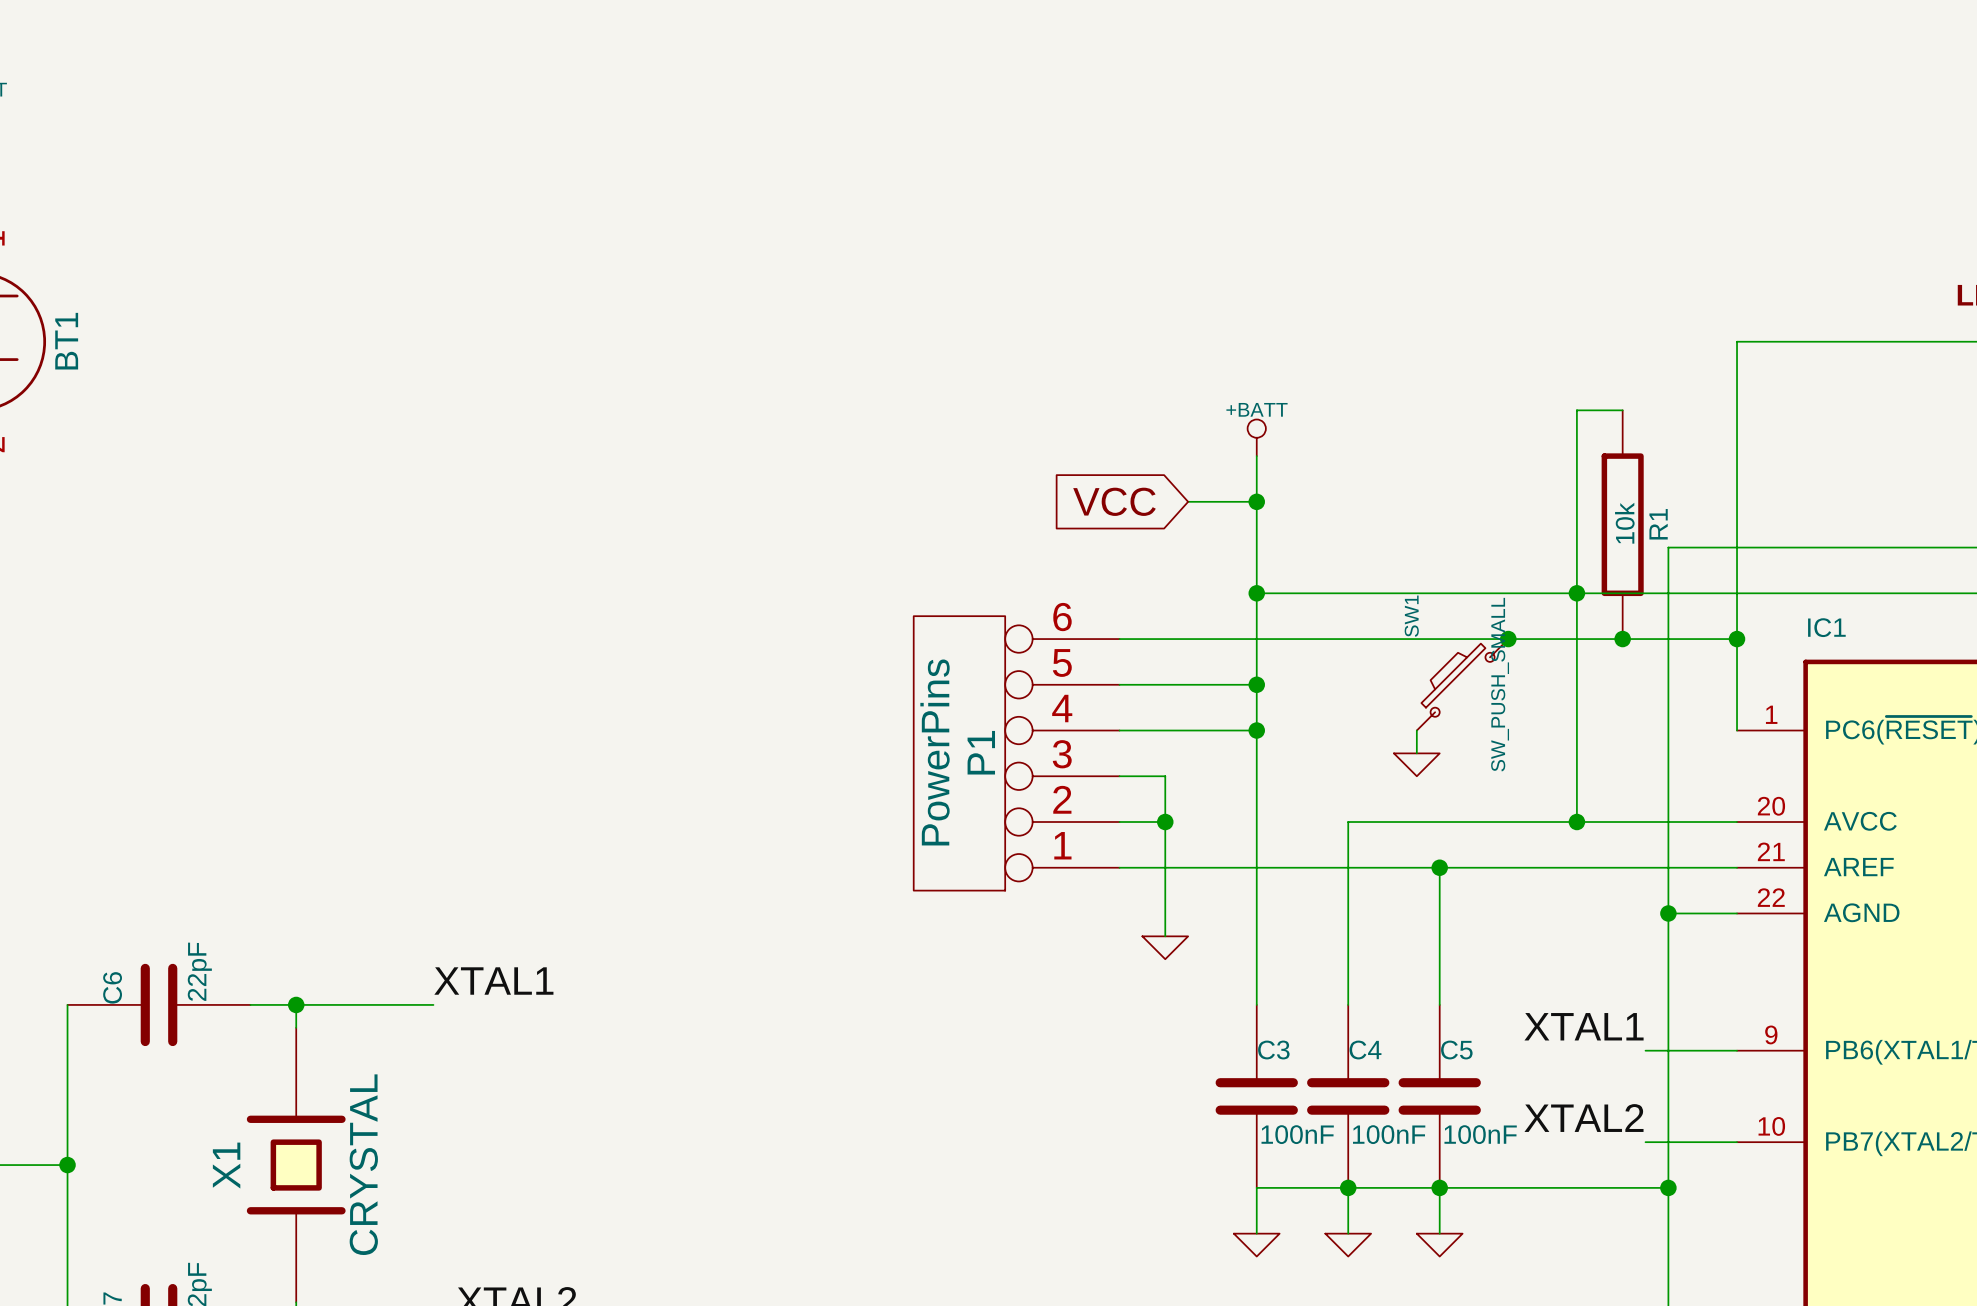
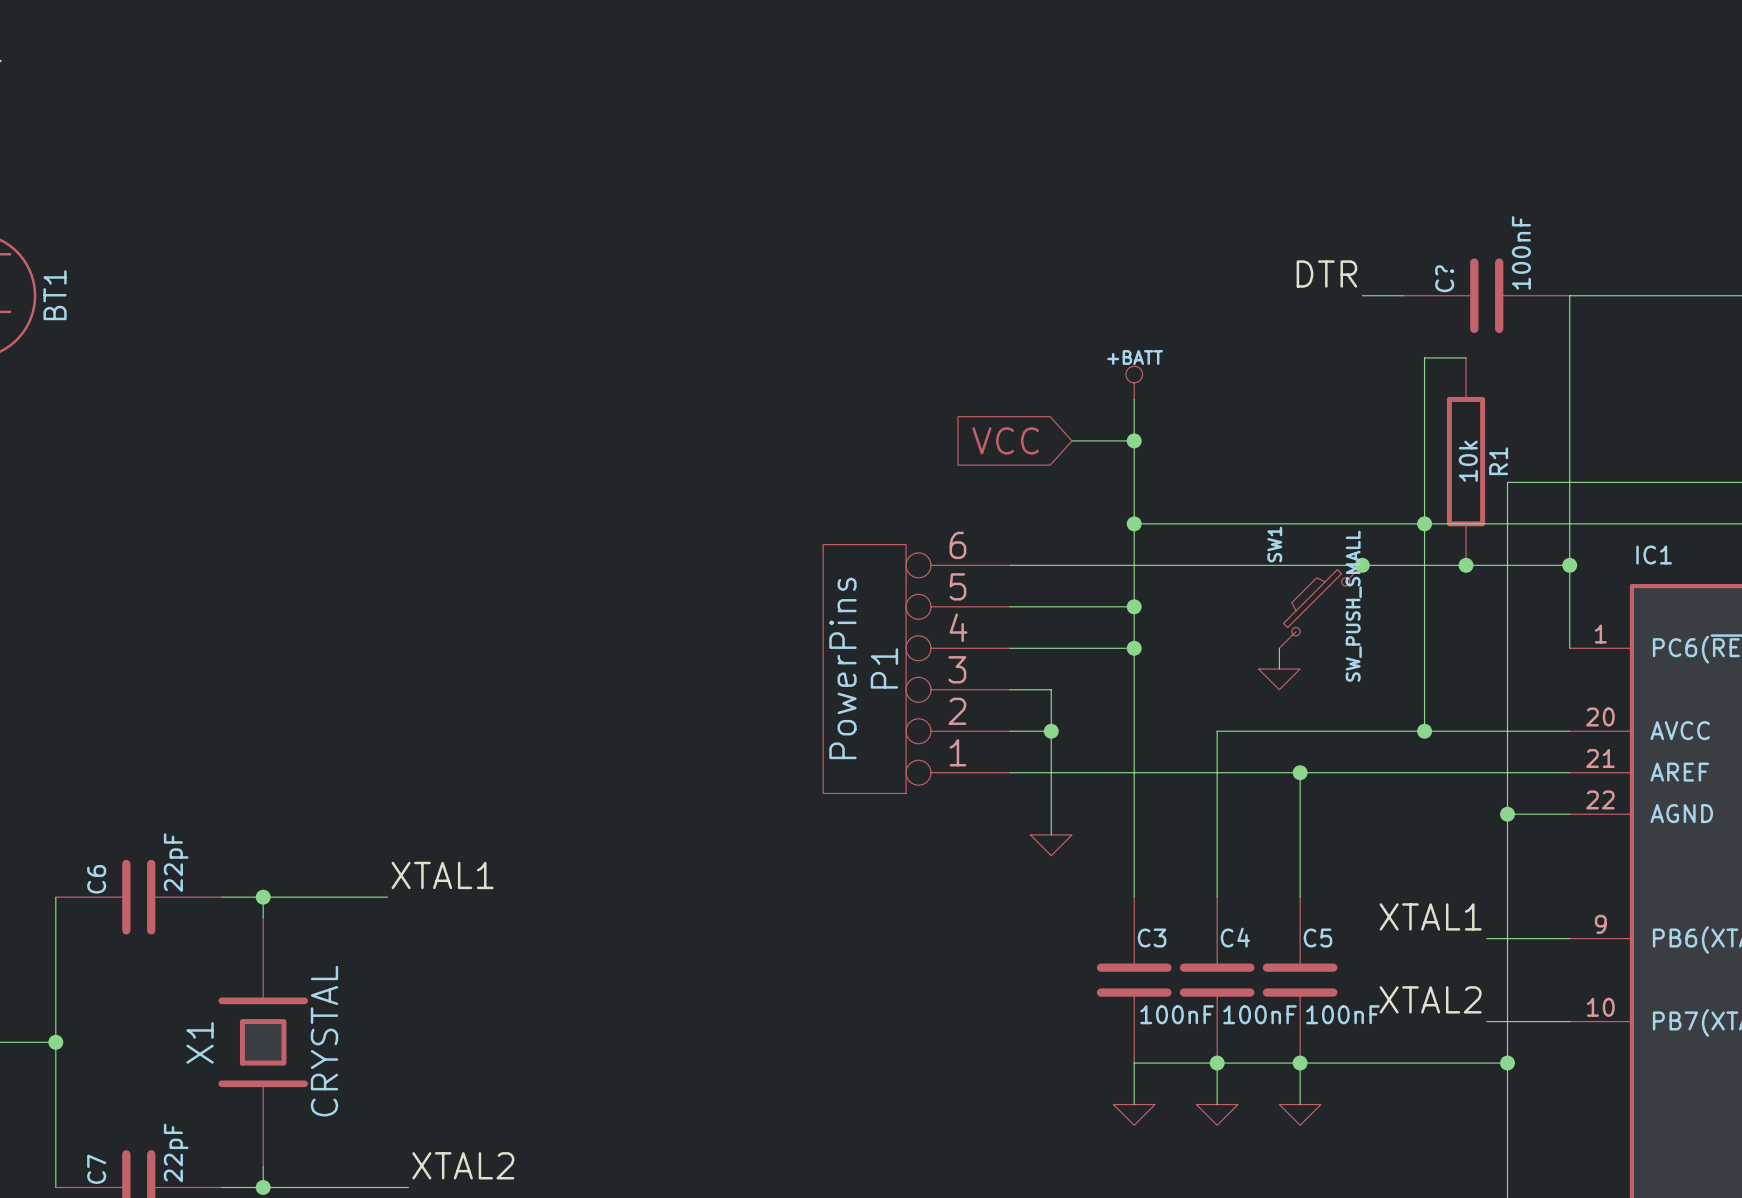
label: none -> DTR (1326, 274)
wire: none -> (1362, 295) (1403, 295)
C?: none -> 100nF (1486, 295)

